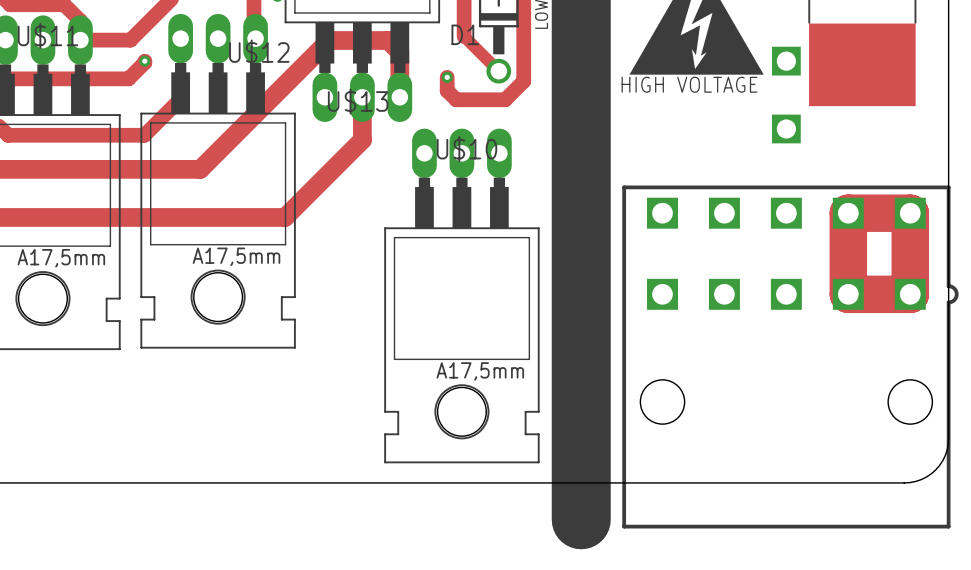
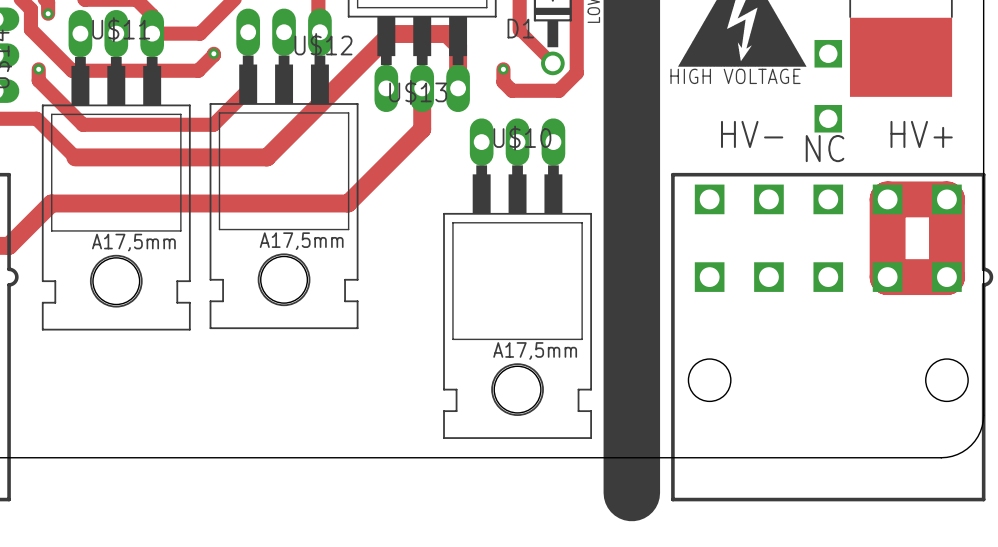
text: none -> HV- (752, 134)
text: none -> HV+ (921, 134)
text: none -> NC (825, 148)

